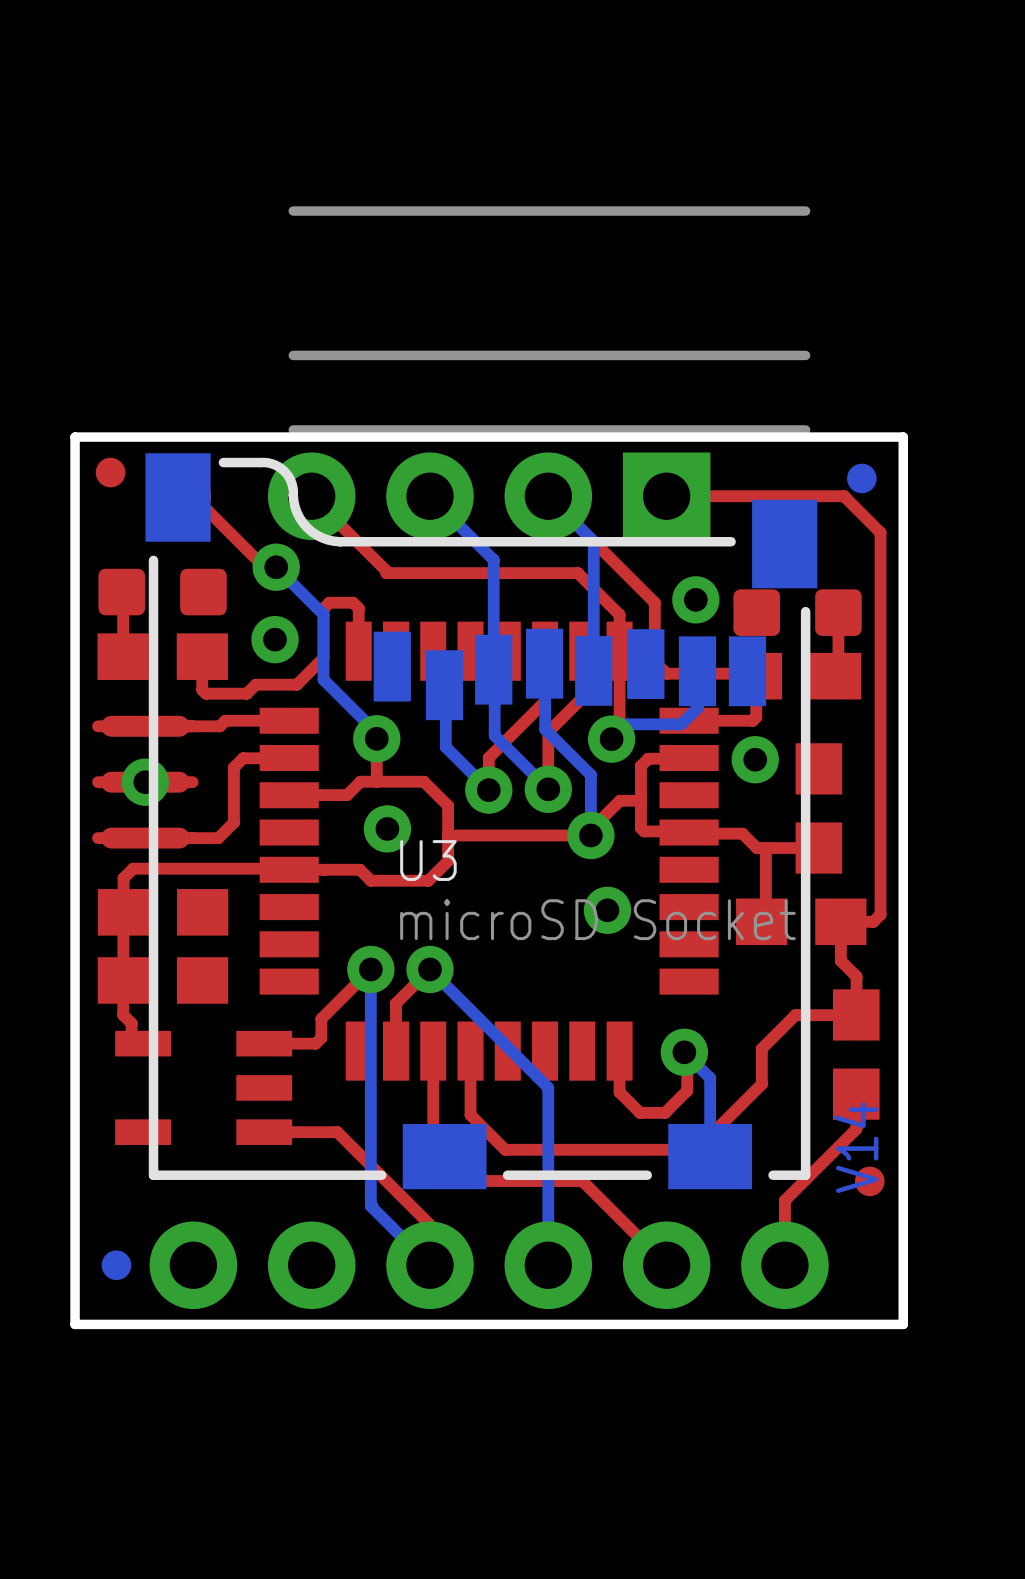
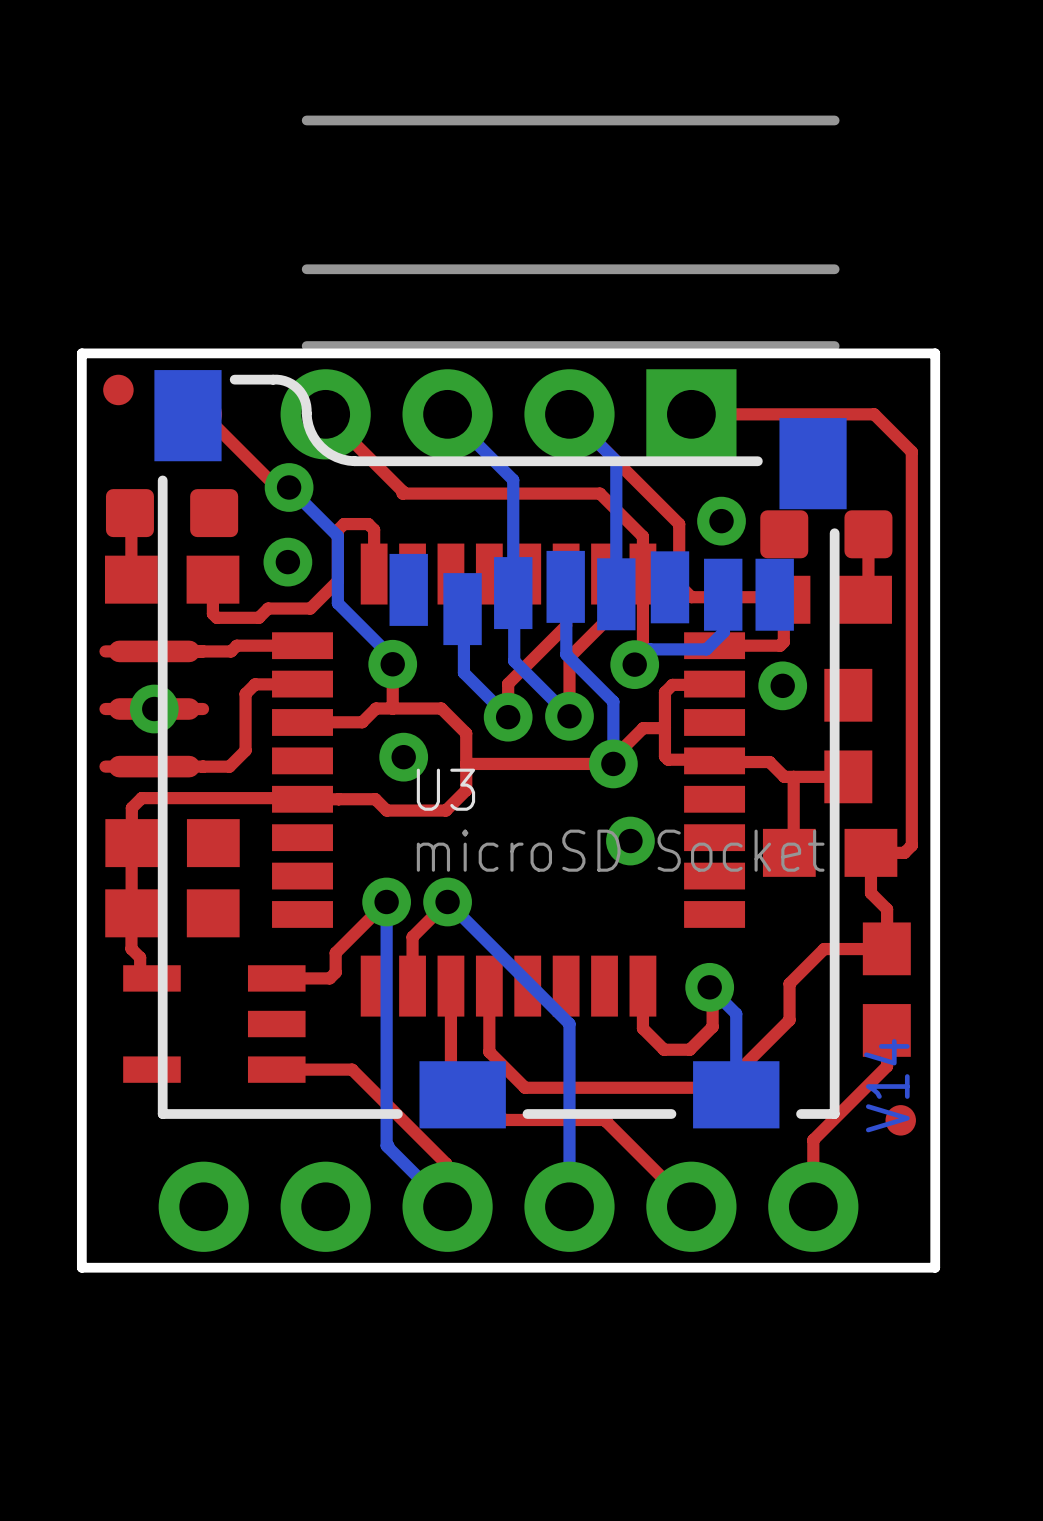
part: (861, 478) -> none
part: (116, 1265) -> none

